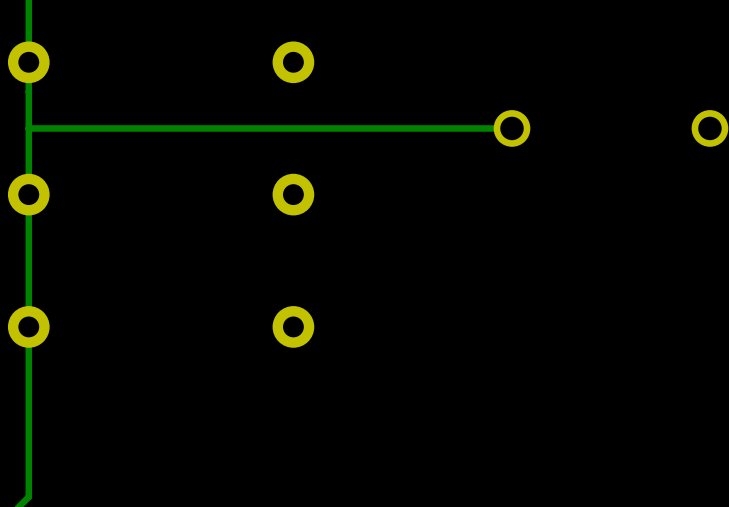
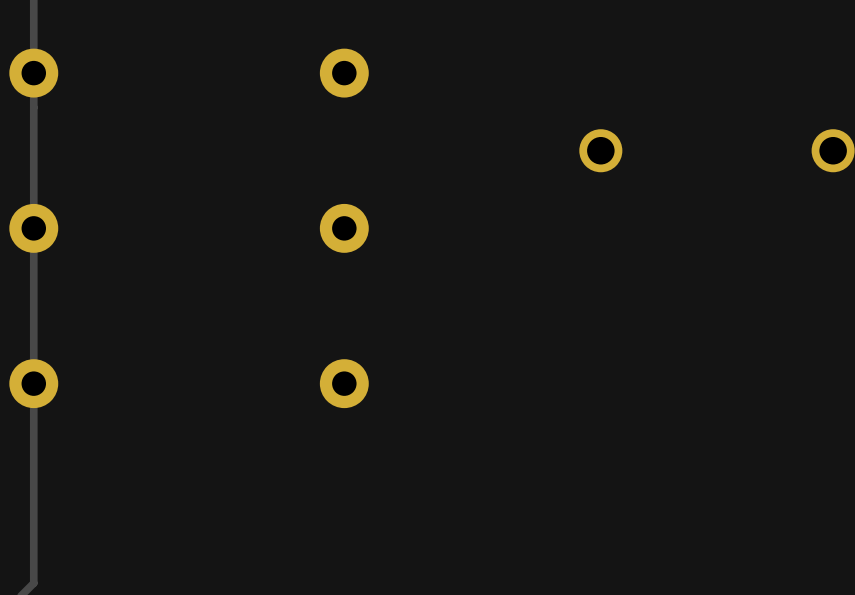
track: (512, 128) (28, 128) -> none

